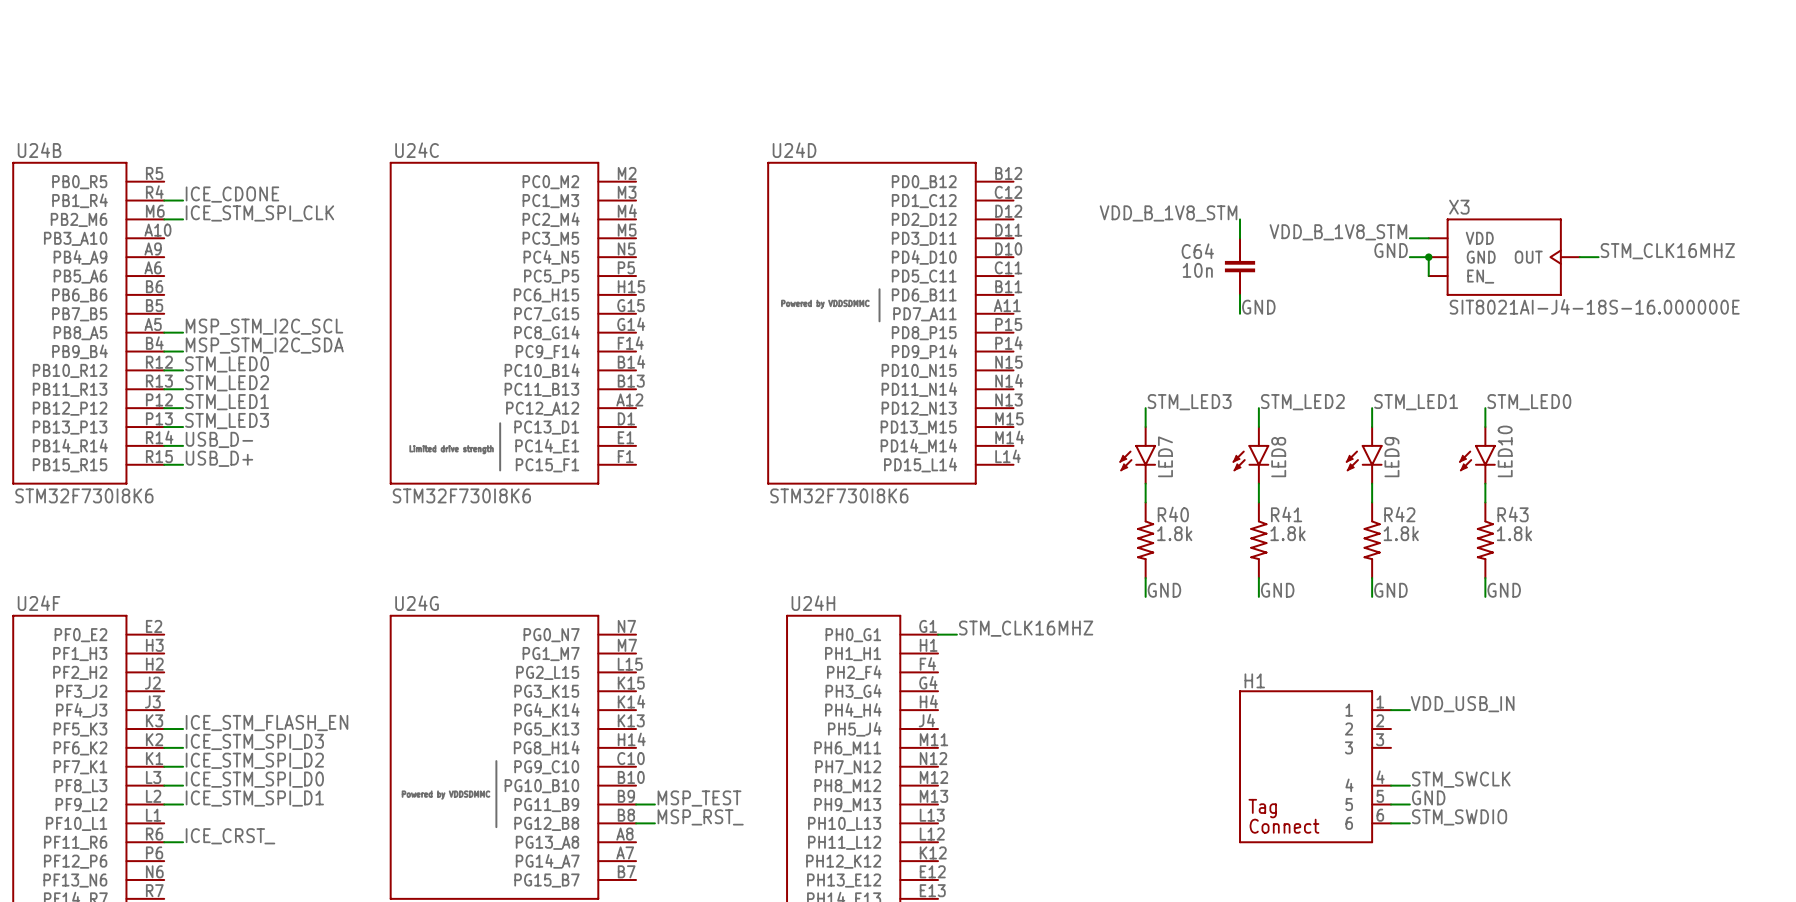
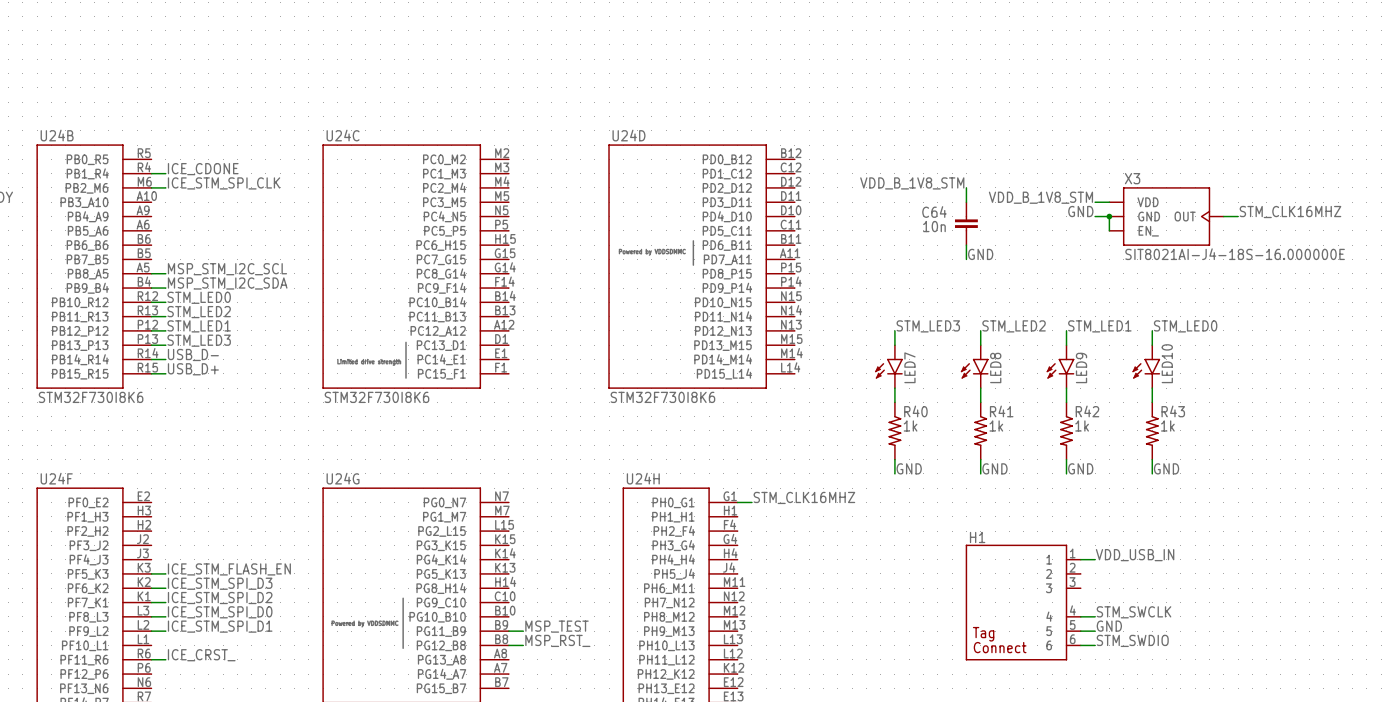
R40 value: 1.8k (1174, 533) -> 1k (910, 425)
R41 value: 1.8k (1287, 533) -> 1k (996, 425)
R42 value: 1.8k (1401, 533) -> 1k (1082, 425)
R43 value: 1.8k (1514, 533) -> 1k (1167, 425)

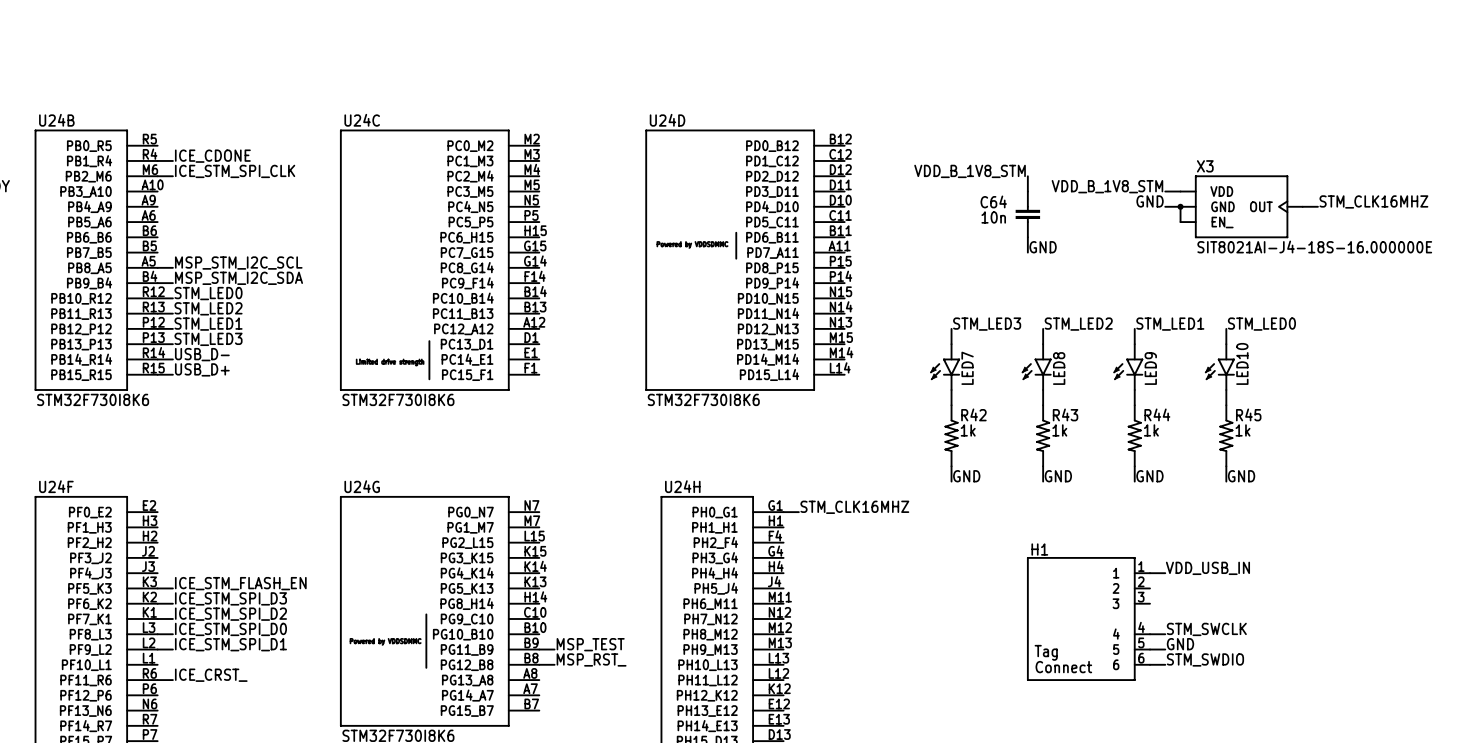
R40 name: R40 (915, 411) -> R42 (973, 414)
R41 name: R41 (1001, 411) -> R43 (1065, 414)
R42 name: R42 (1087, 411) -> R44 (1157, 414)
R43 name: R43 (1173, 411) -> R45 (1248, 414)

